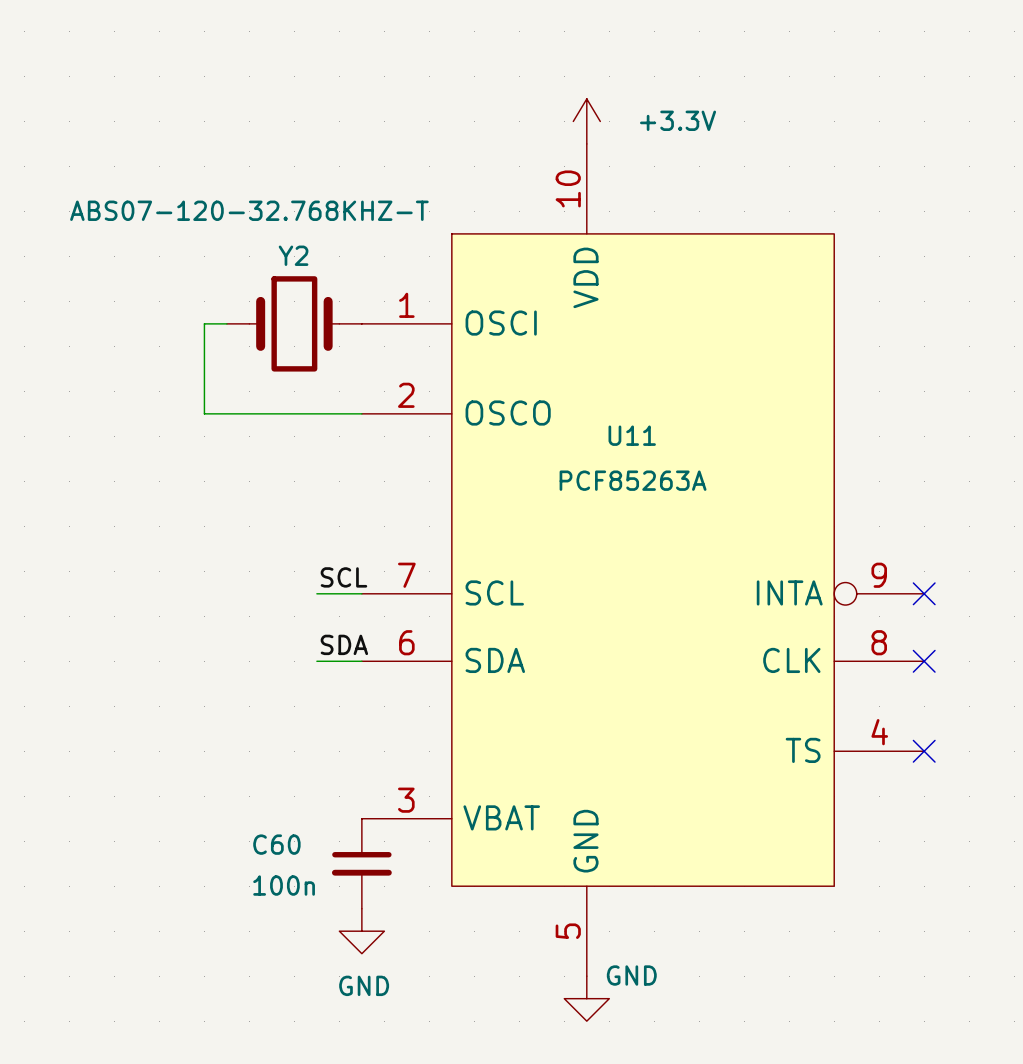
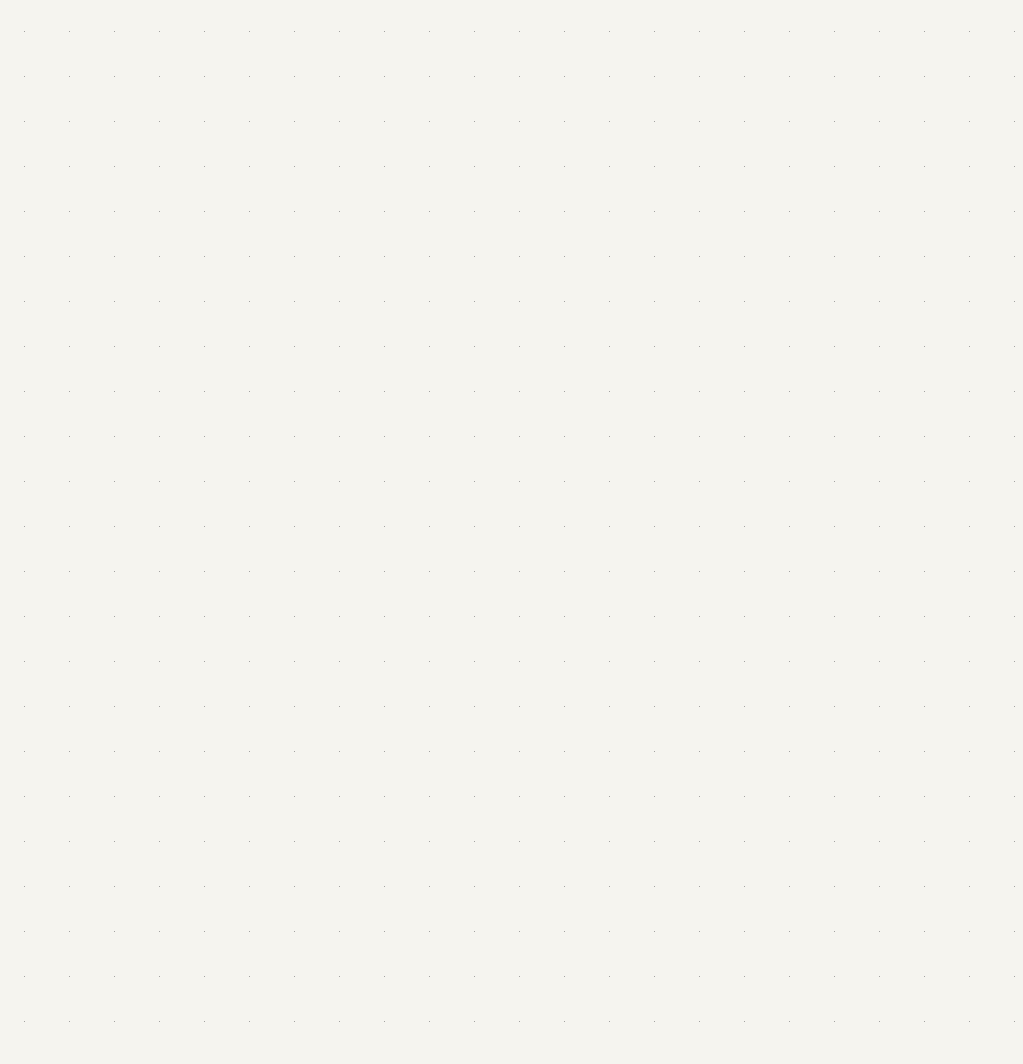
power symbol: +3.3V (586, 121) -> none
wire: (226, 323) (204, 323) (204, 413) (361, 413) -> none
Y2: ABS07-120-32.768KHZ-T (294, 323) -> none
U11: PCF85263A (643, 560) -> none
label: SCL (343, 577) -> none
wire: (316, 593) (361, 593) -> none
no-connect mark: (924, 593) -> none
label: SDA (344, 644) -> none
wire: (316, 661) (361, 661) -> none
no-connect mark: (924, 661) -> none
no-connect mark: (924, 751) -> none
C60: 100n (361, 863) -> none
power symbol: GND (361, 931) -> none
power symbol: GND (586, 998) -> none

